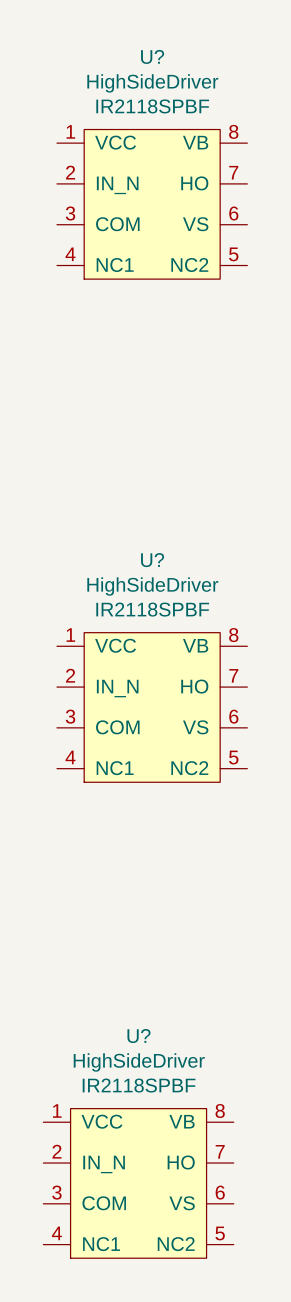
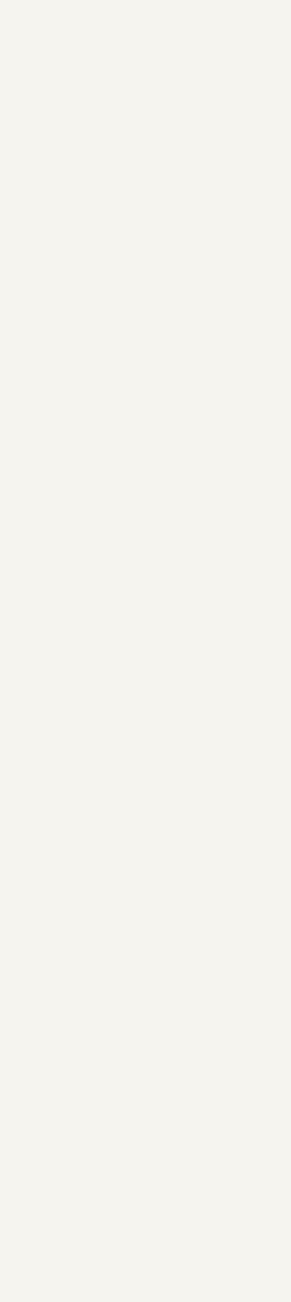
U?: HighSideDriver (152, 204) -> none
U?: HighSideDriver (152, 707) -> none
U?: HighSideDriver (138, 1183) -> none

